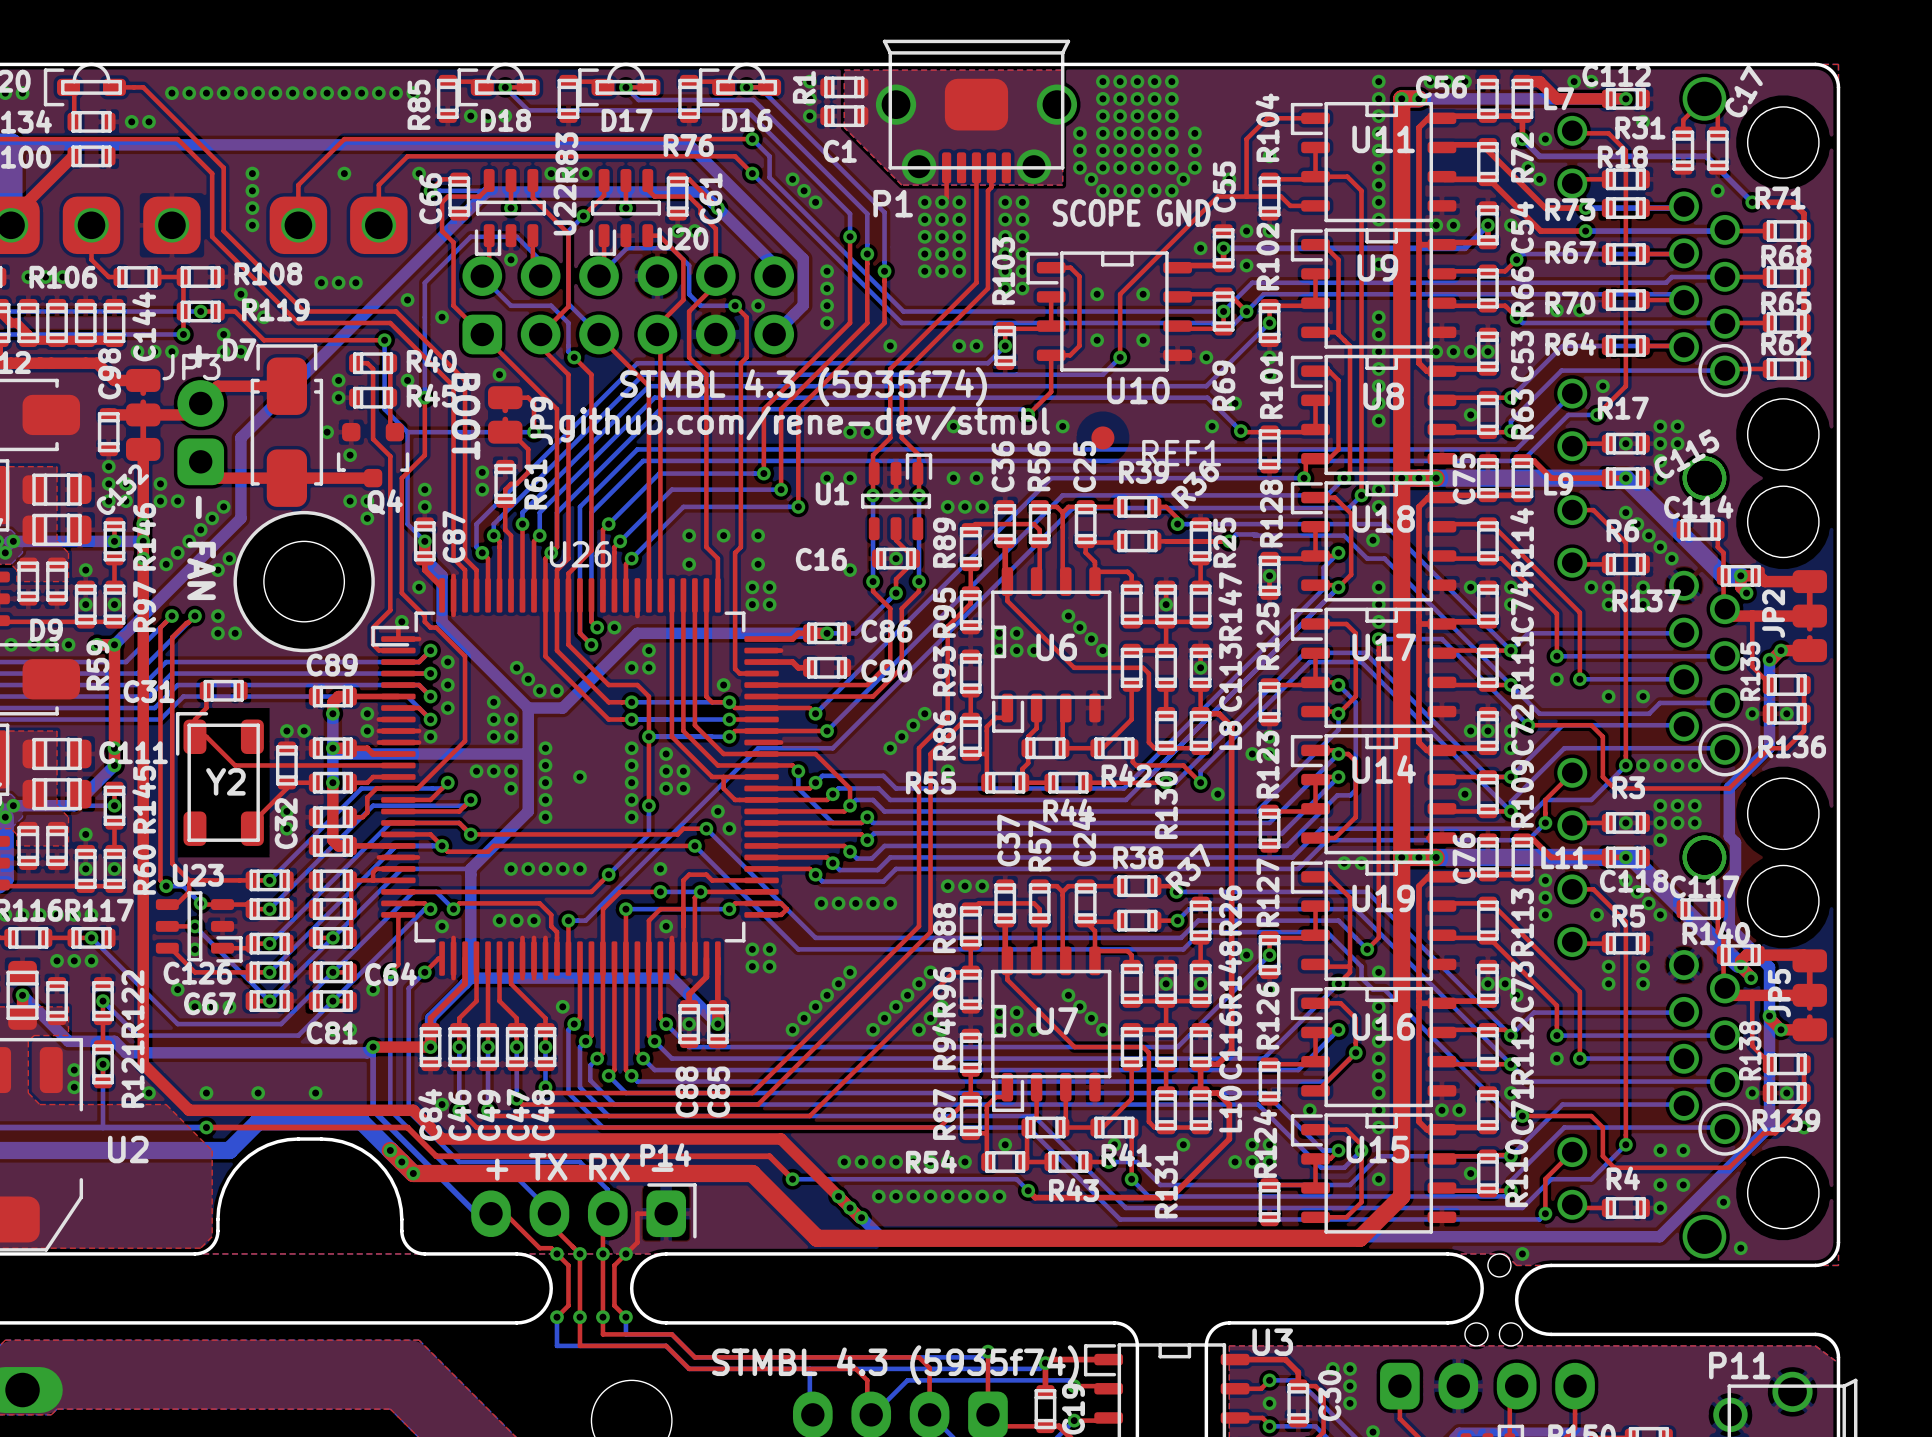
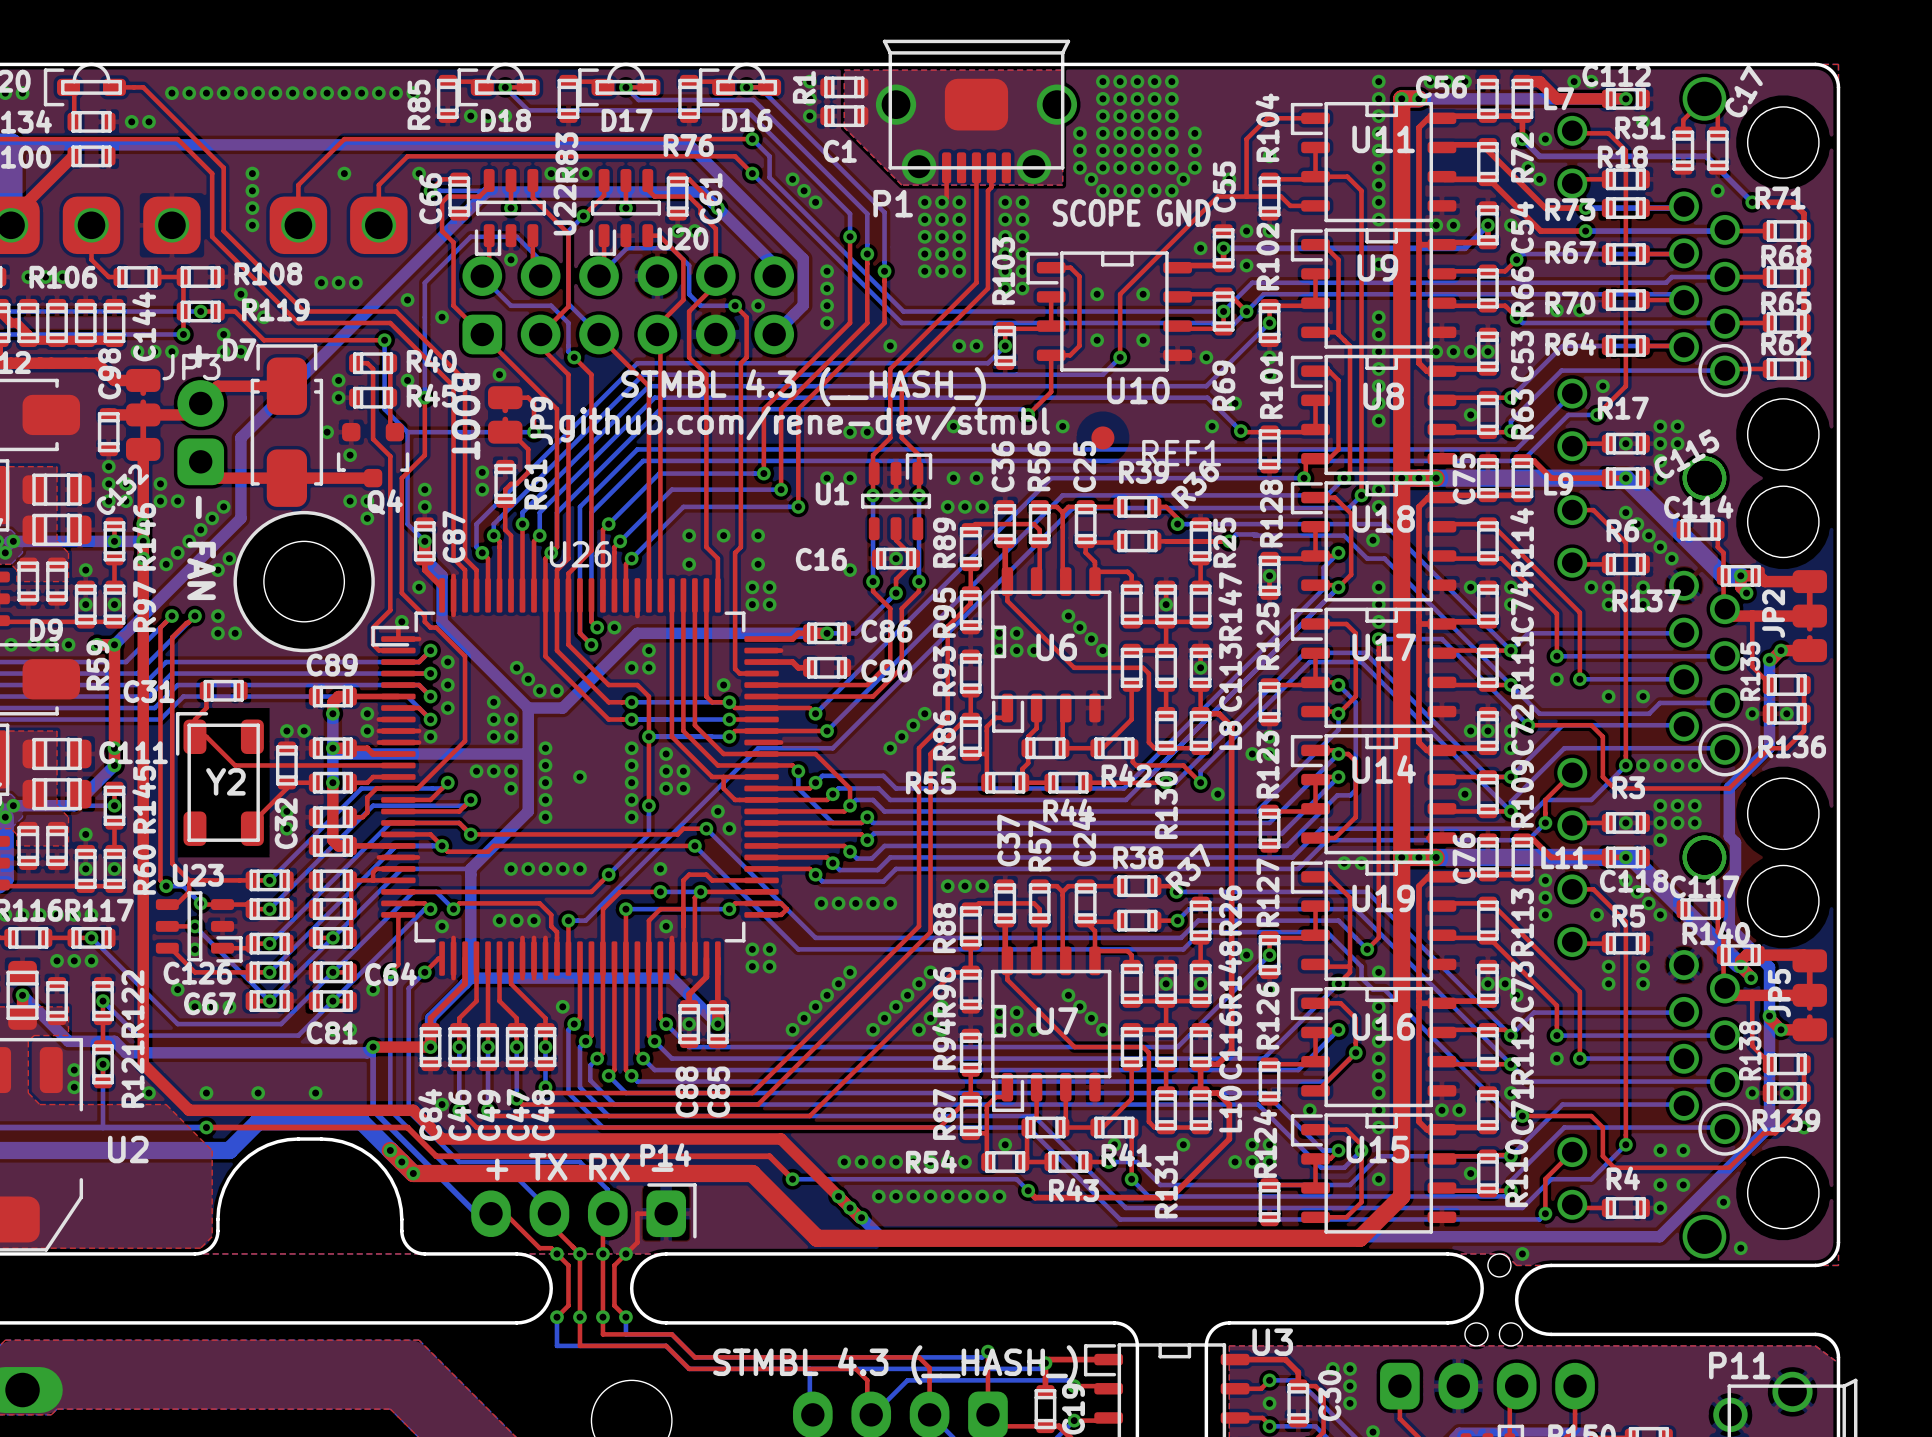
text: STMBL 4.3 (5935f74) (803, 386) -> STMBL 4.3 (__HASH_) (803, 386)
text: STMBL 4.3 (5935f74) (895, 1365) -> STMBL 4.3 (__HASH_) (895, 1365)

